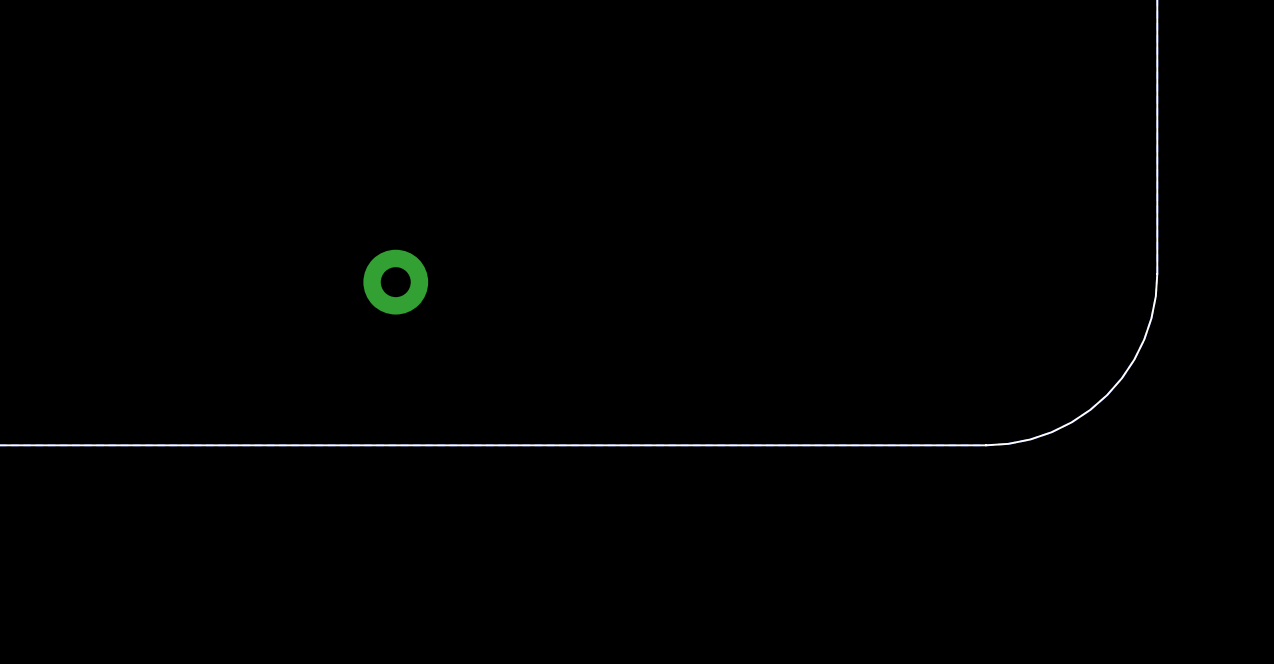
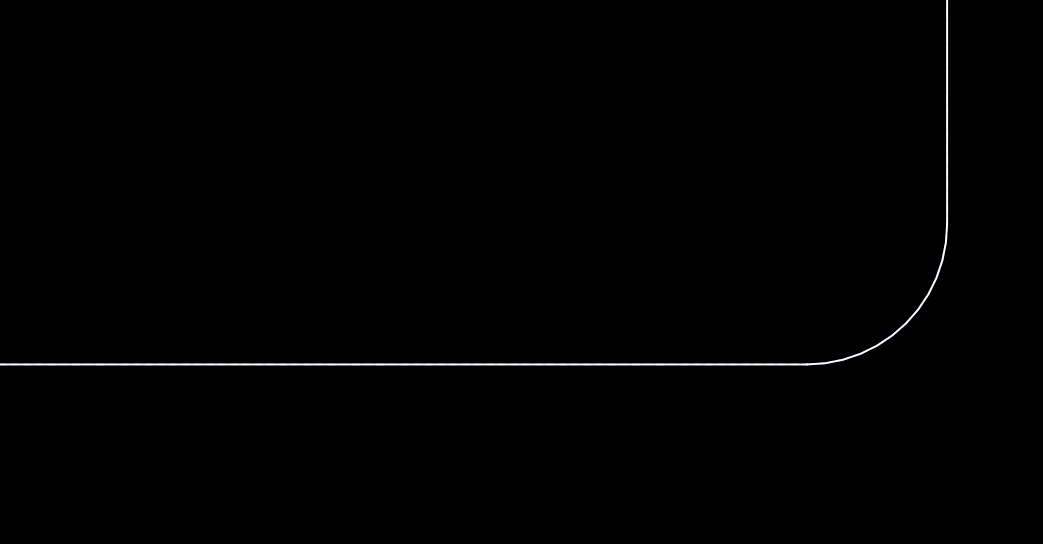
via: (395, 282) -> none

